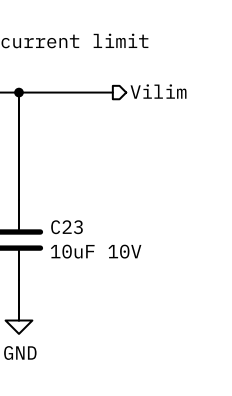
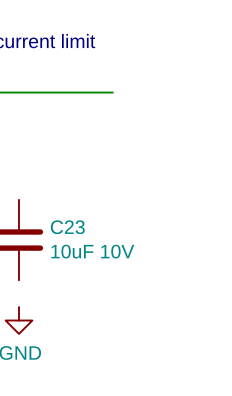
hierarchical label: Vilim (158, 91) -> none
wire: (18, 92) (18, 199) -> none
junction: (18, 92) -> none
wire: (18, 280) (18, 307) -> none

